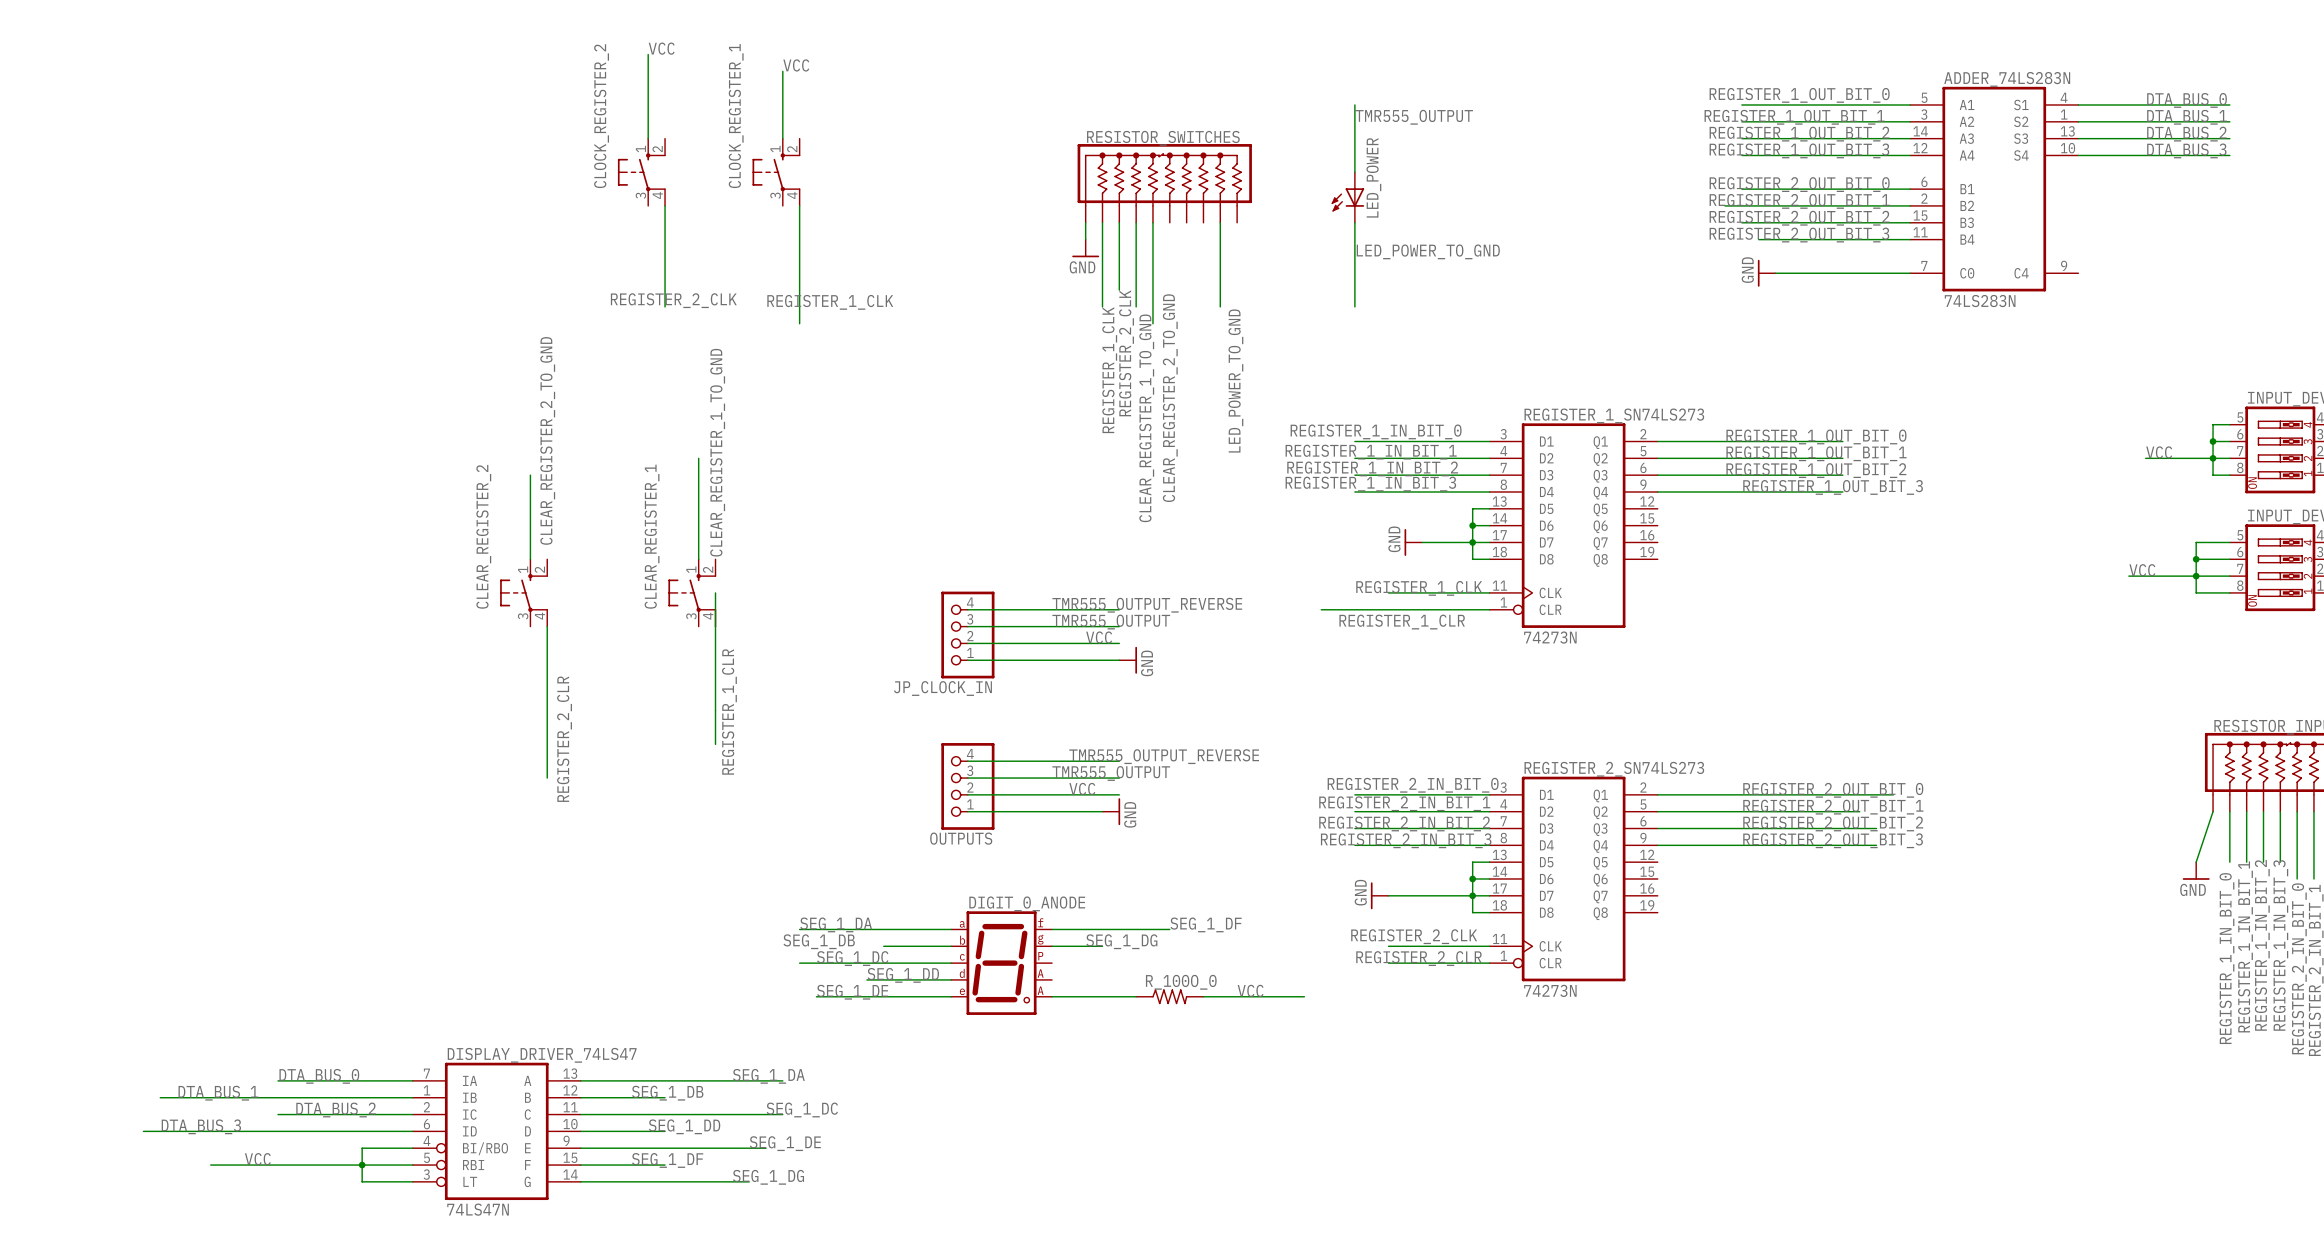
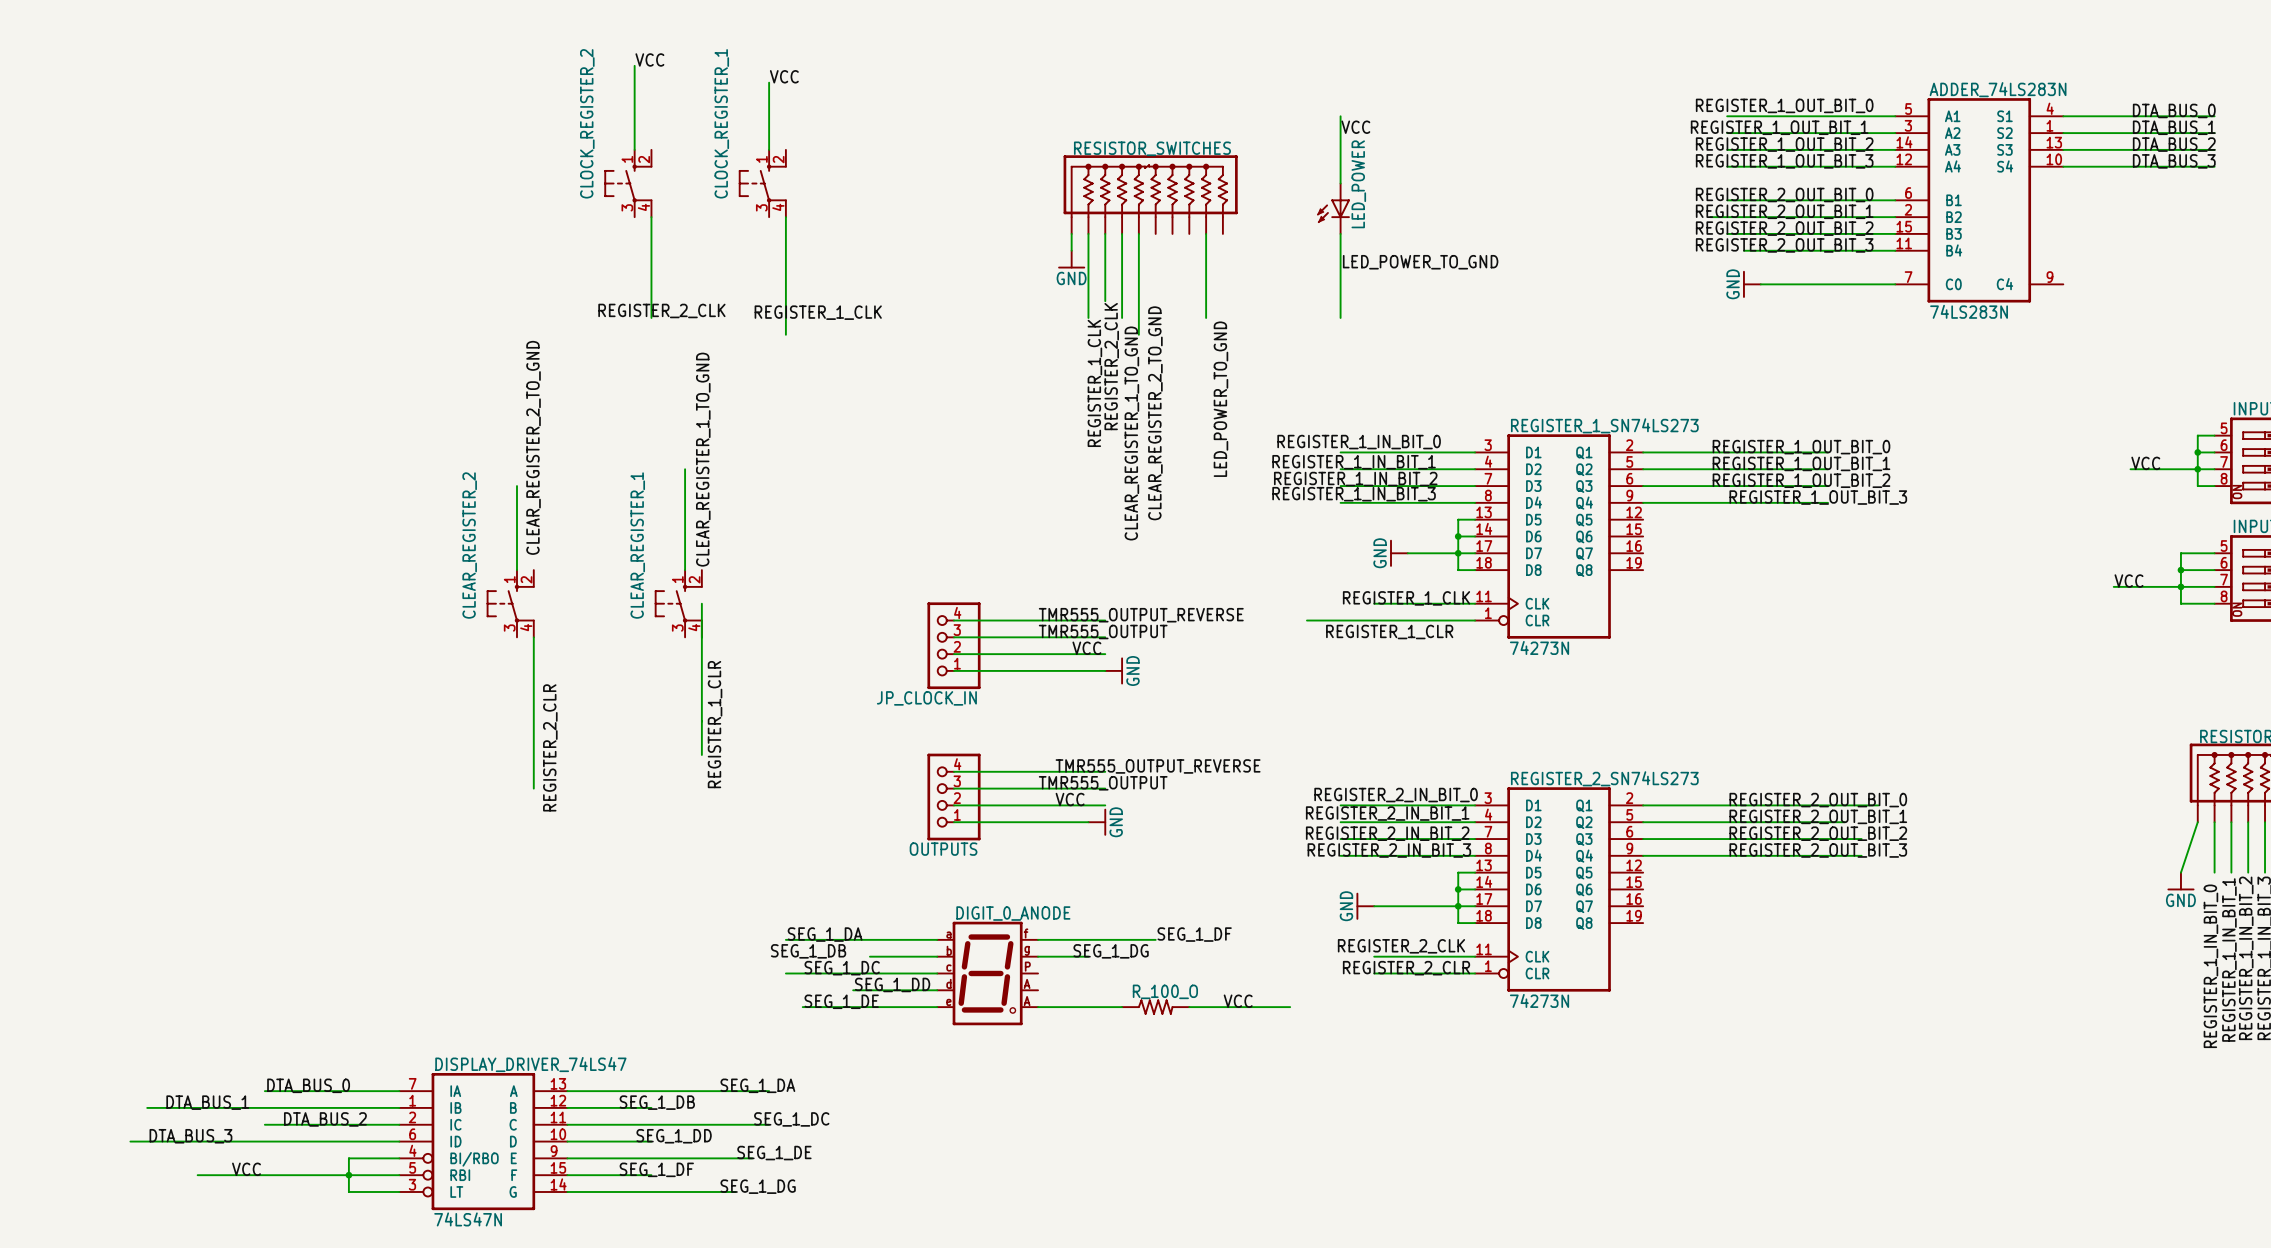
label: TMR555_OUTPUT (1414, 117) -> VCC (1355, 127)
R_100O_0 name: R_100O_0 (1181, 982) -> R_100_O (1165, 991)

